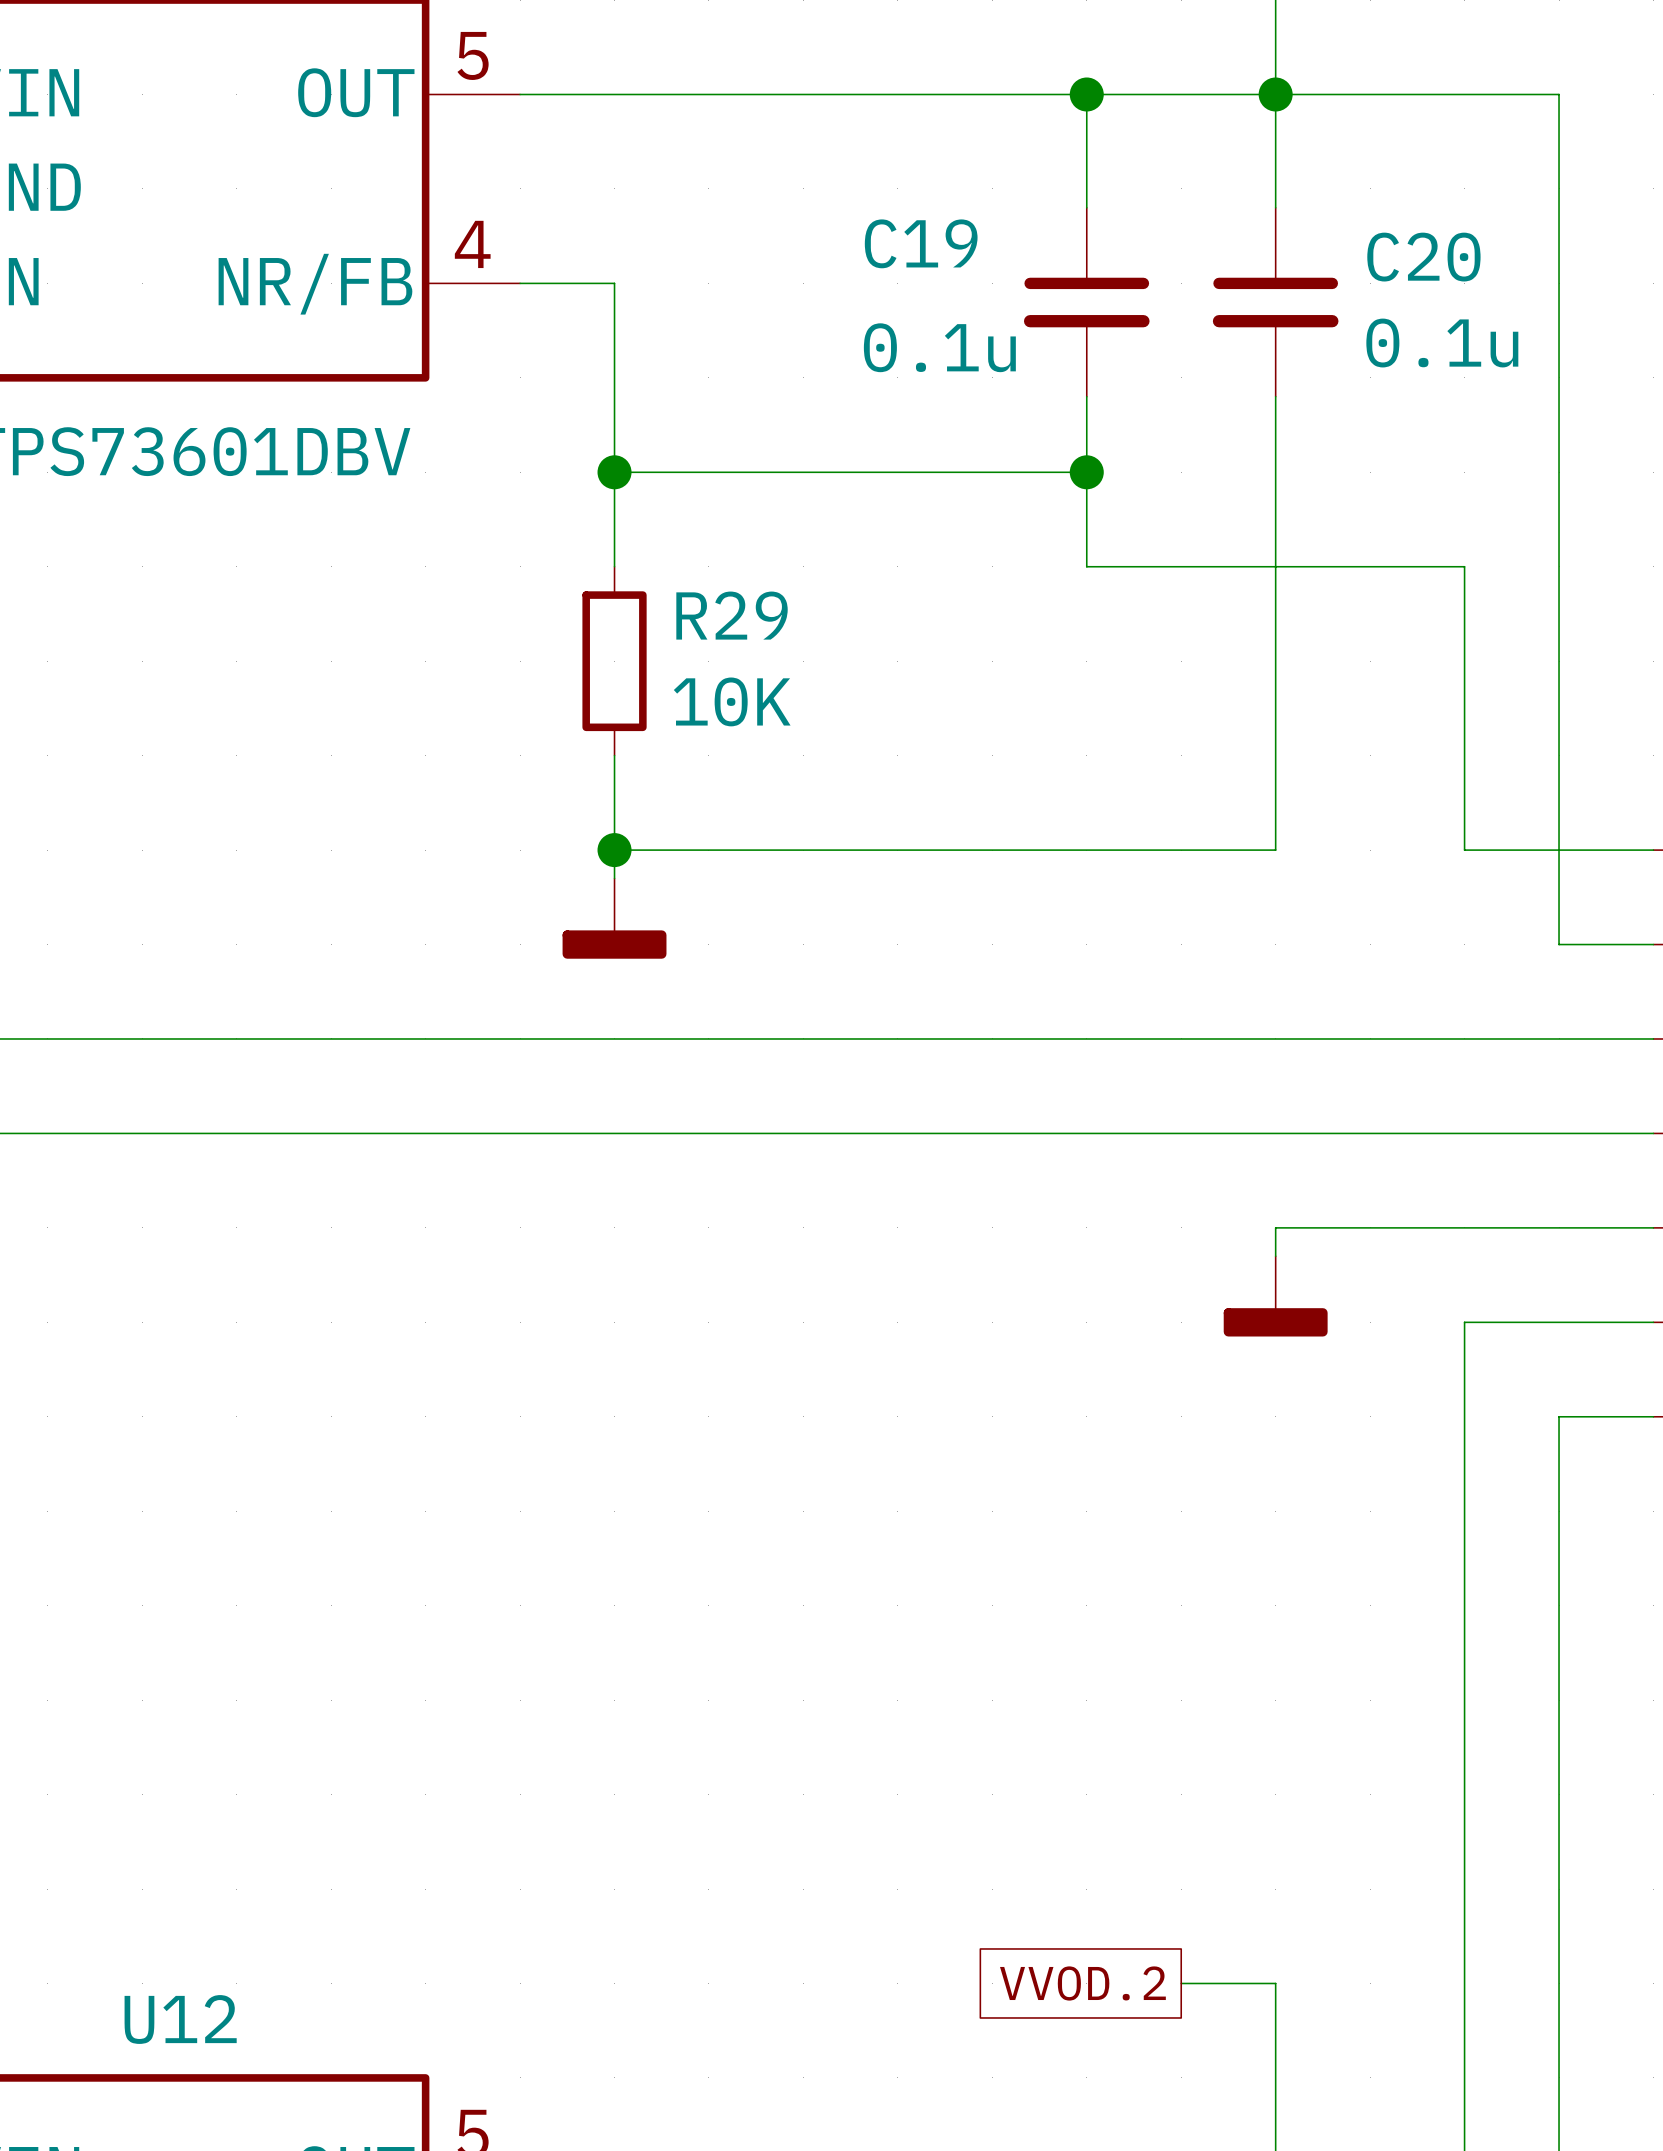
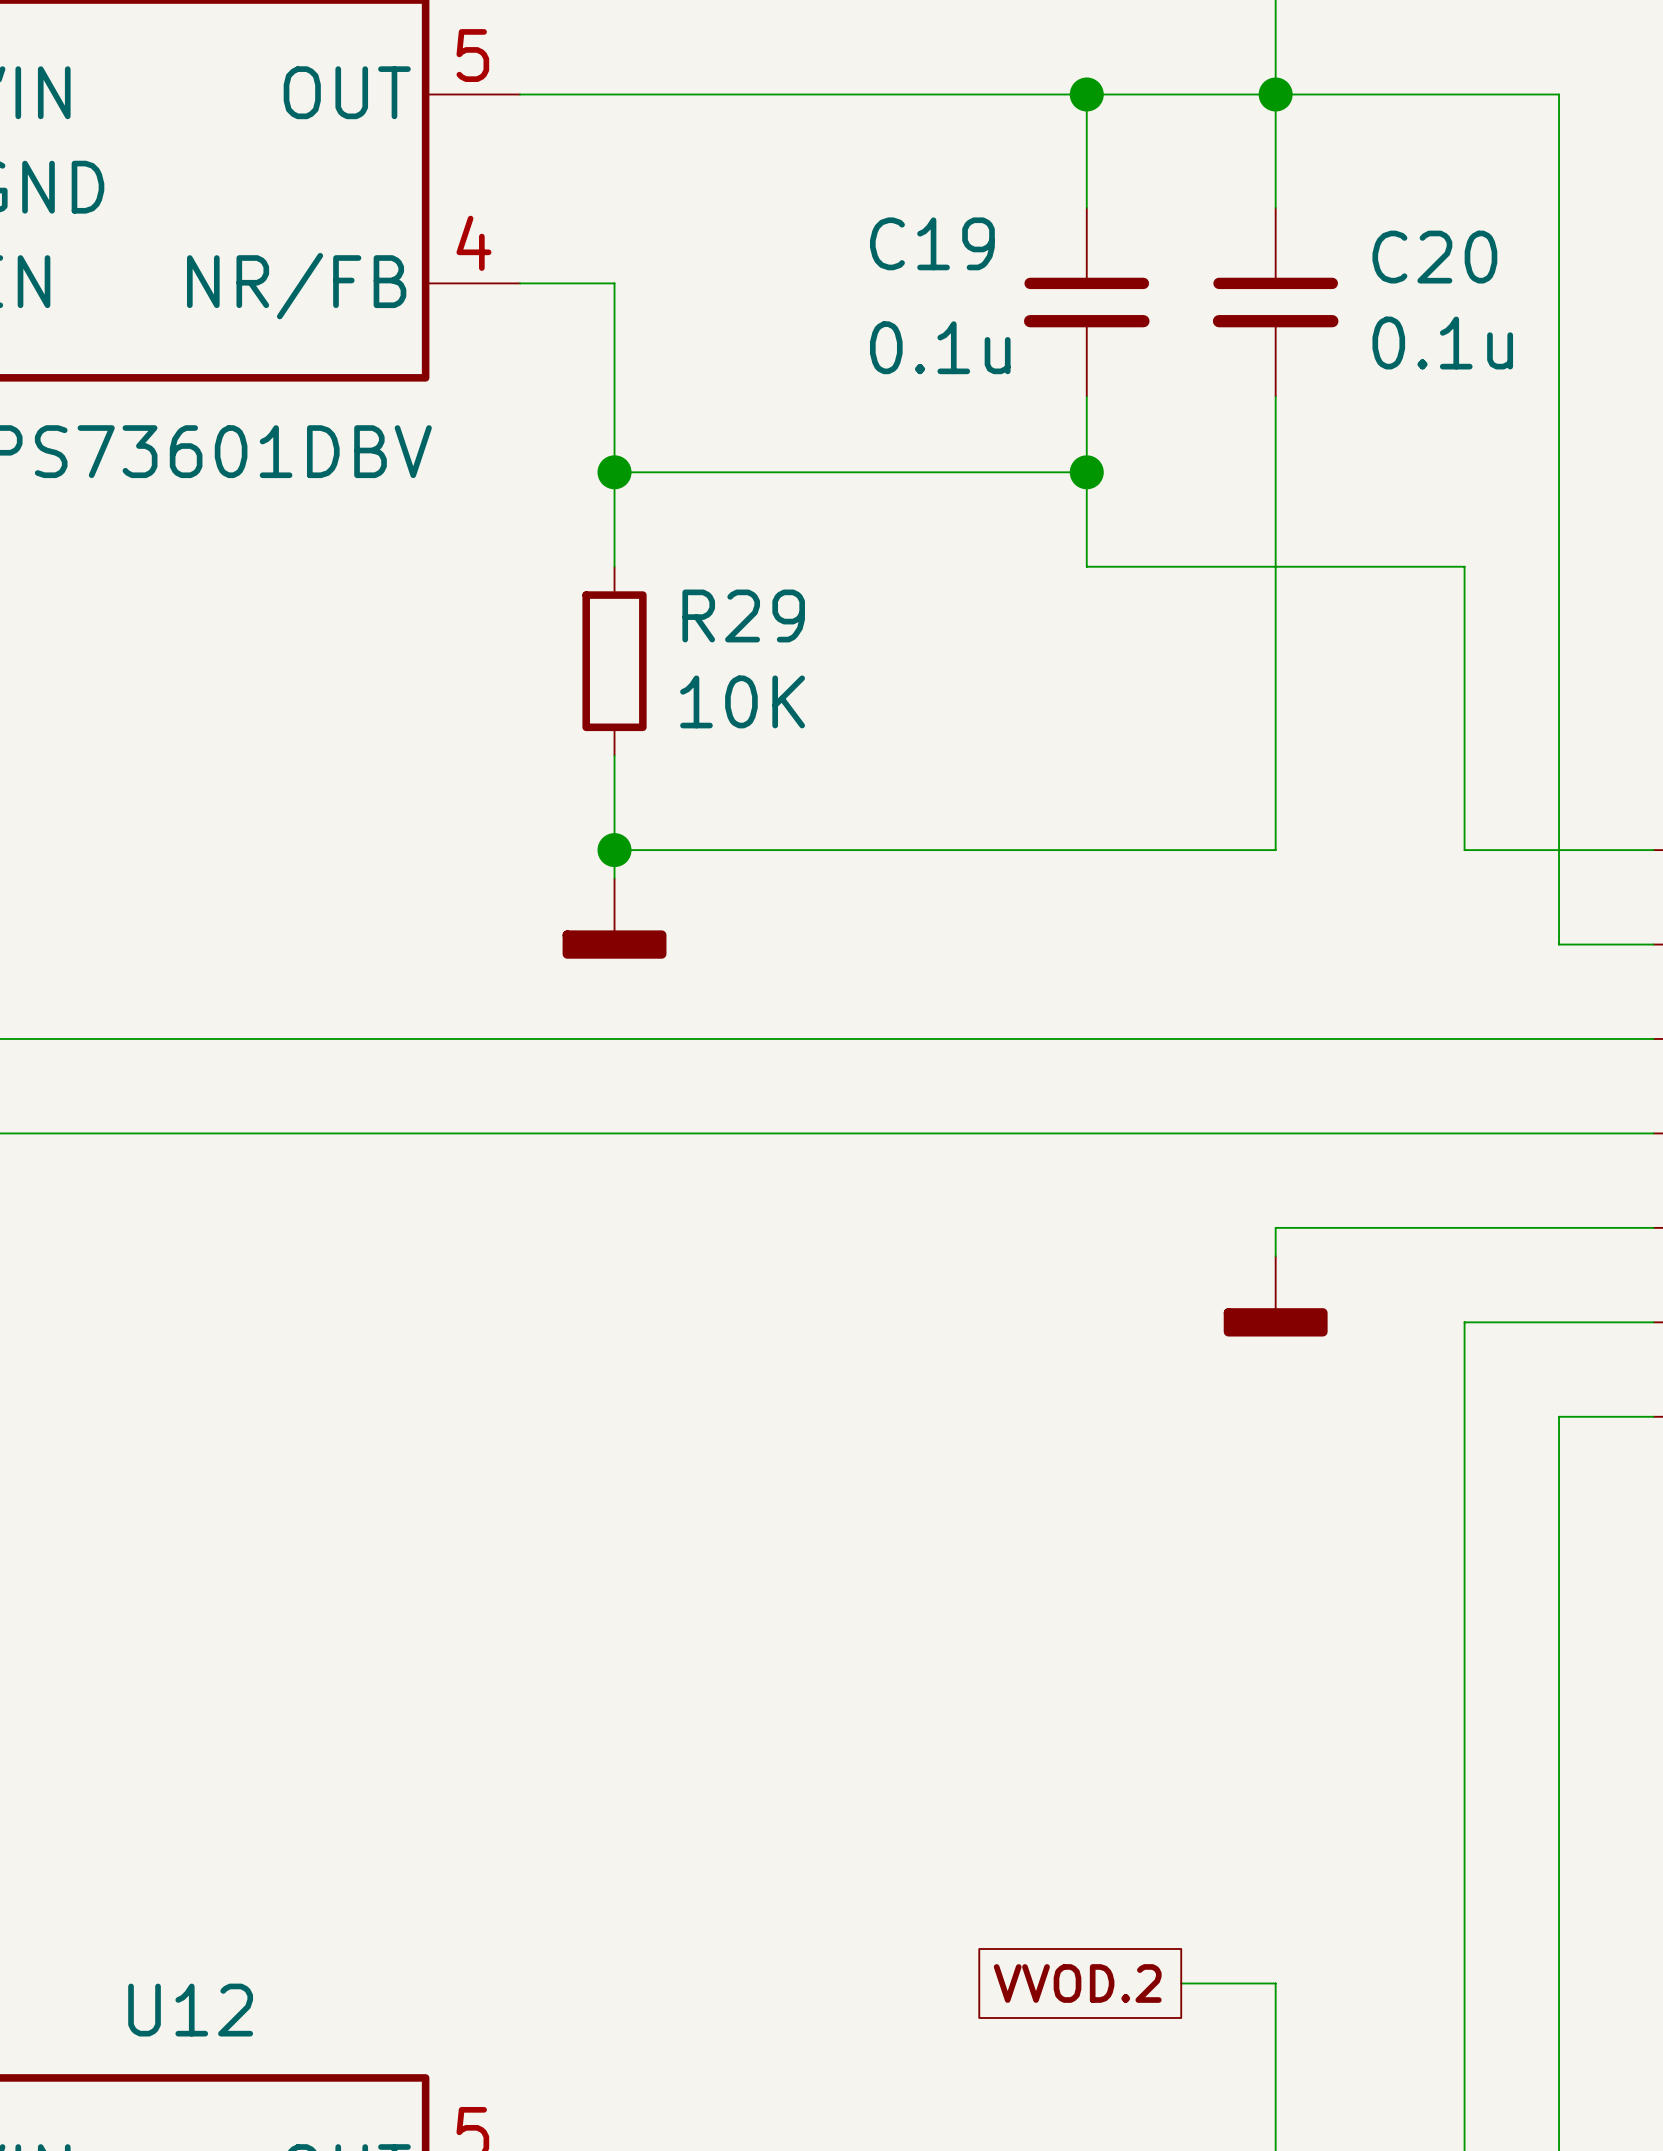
U12 name position: U12 (180, 2019) -> U12 (190, 2010)

